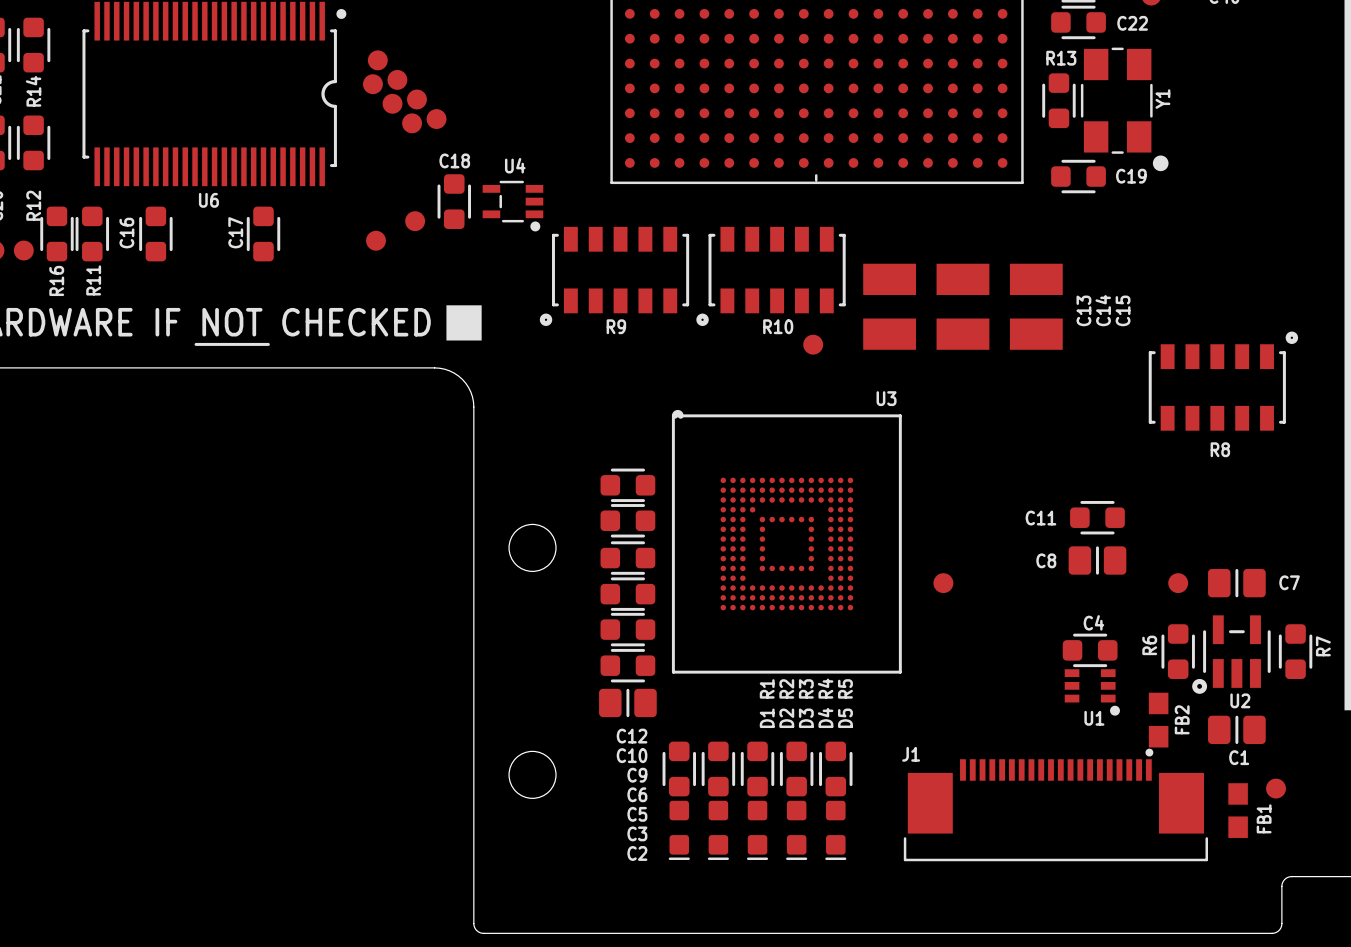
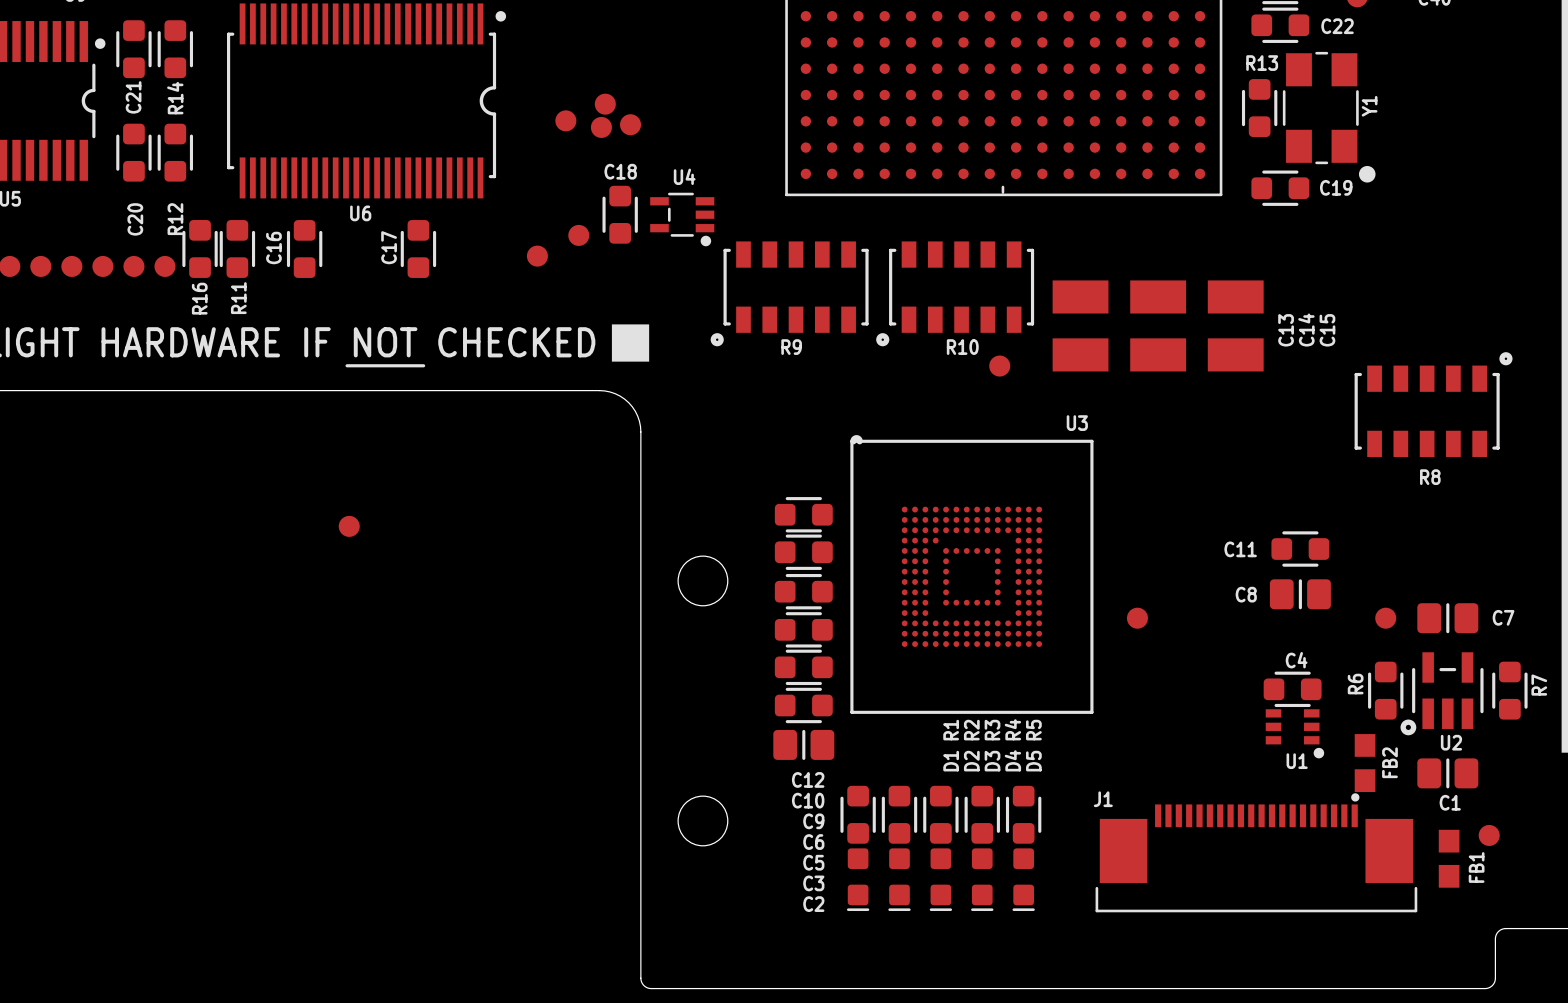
part: (377, 60) -> none
part: (397, 79) -> none
part: (372, 84) -> none
part: none -> (605, 104)
part: (416, 99) -> none
part: (392, 103) -> none
part: none -> (565, 120)
part: none -> (630, 124)
part: (412, 123) -> none
part: none -> (349, 526)

